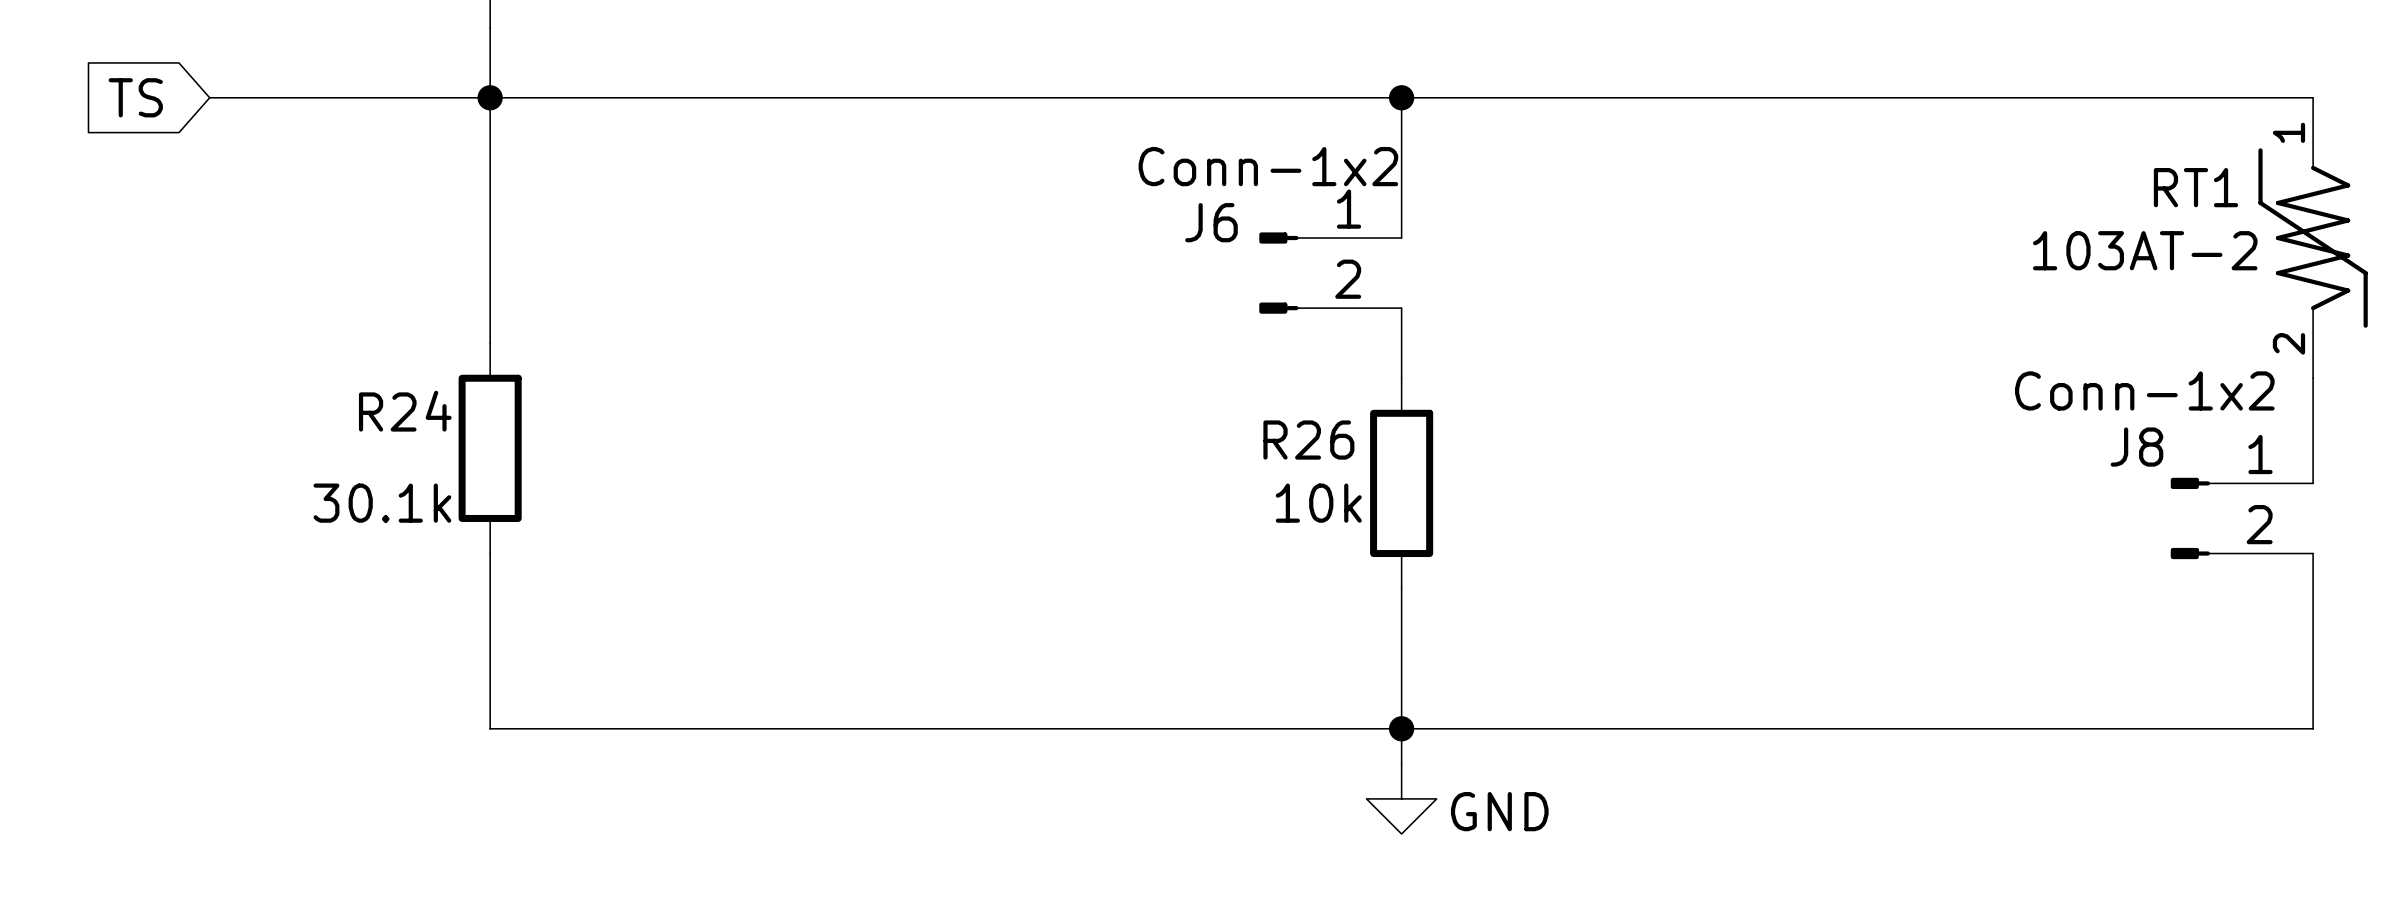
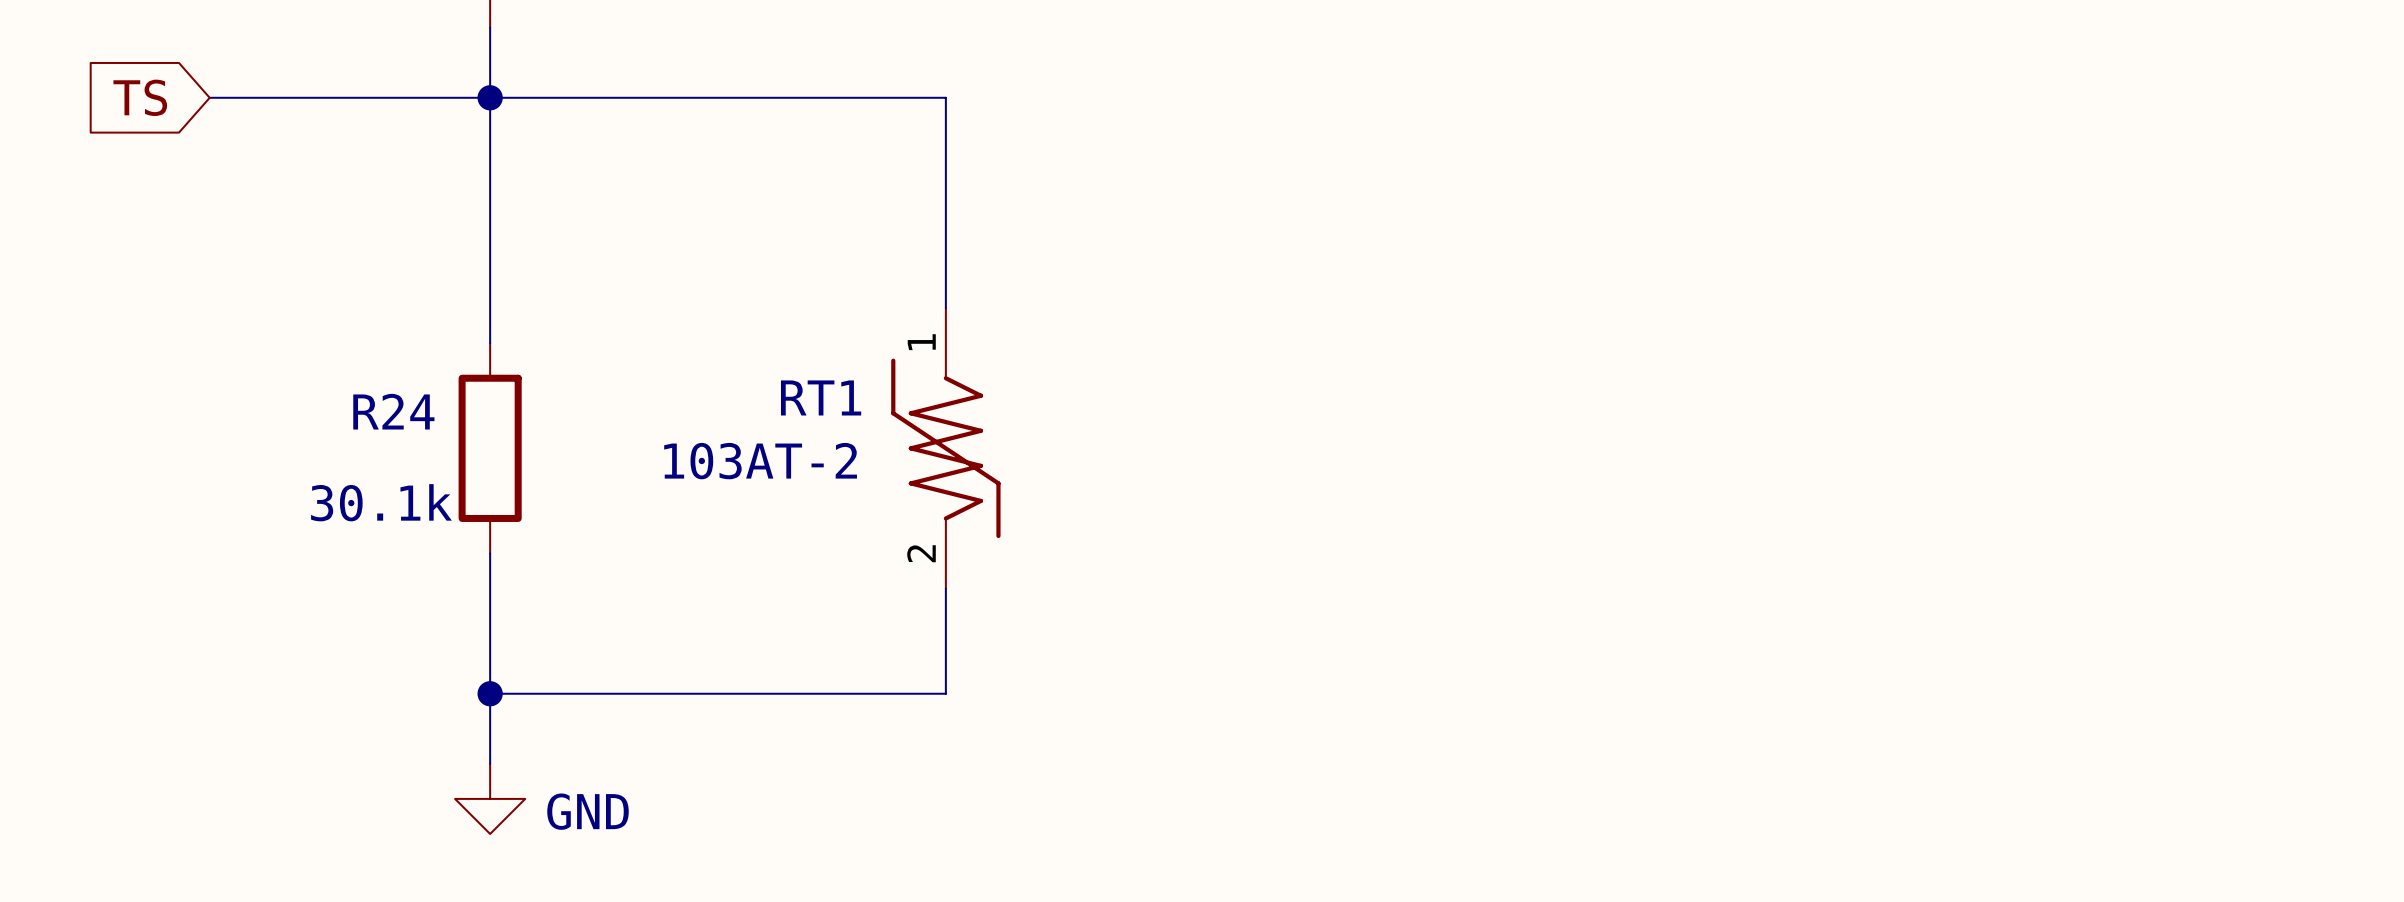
wire: (945, 97) (2313, 97) -> (945, 97) (945, 308)
wire: (1401, 97) (1401, 238) -> none
junction: (1401, 97) -> none
RT1 position: (2313, 238) -> (945, 448)
J6: Conn-1x2 (1330, 273) -> none
wire: (1401, 308) (1401, 378) -> none
wire: (2313, 378) (2313, 483) -> none
R26: 10k (1401, 483) -> none
J8: Conn-1x2 (2241, 518) -> none
wire: (2313, 553) (2313, 728) (490, 728) -> (490, 763) (490, 728)
wire: none -> (945, 588) (945, 693) (490, 693)
wire: (1401, 588) (1401, 763) -> none
junction: none -> (490, 693)
junction: (1401, 728) -> none
power symbol: none -> GND (490, 798)
power symbol: GND (1401, 798) -> none

